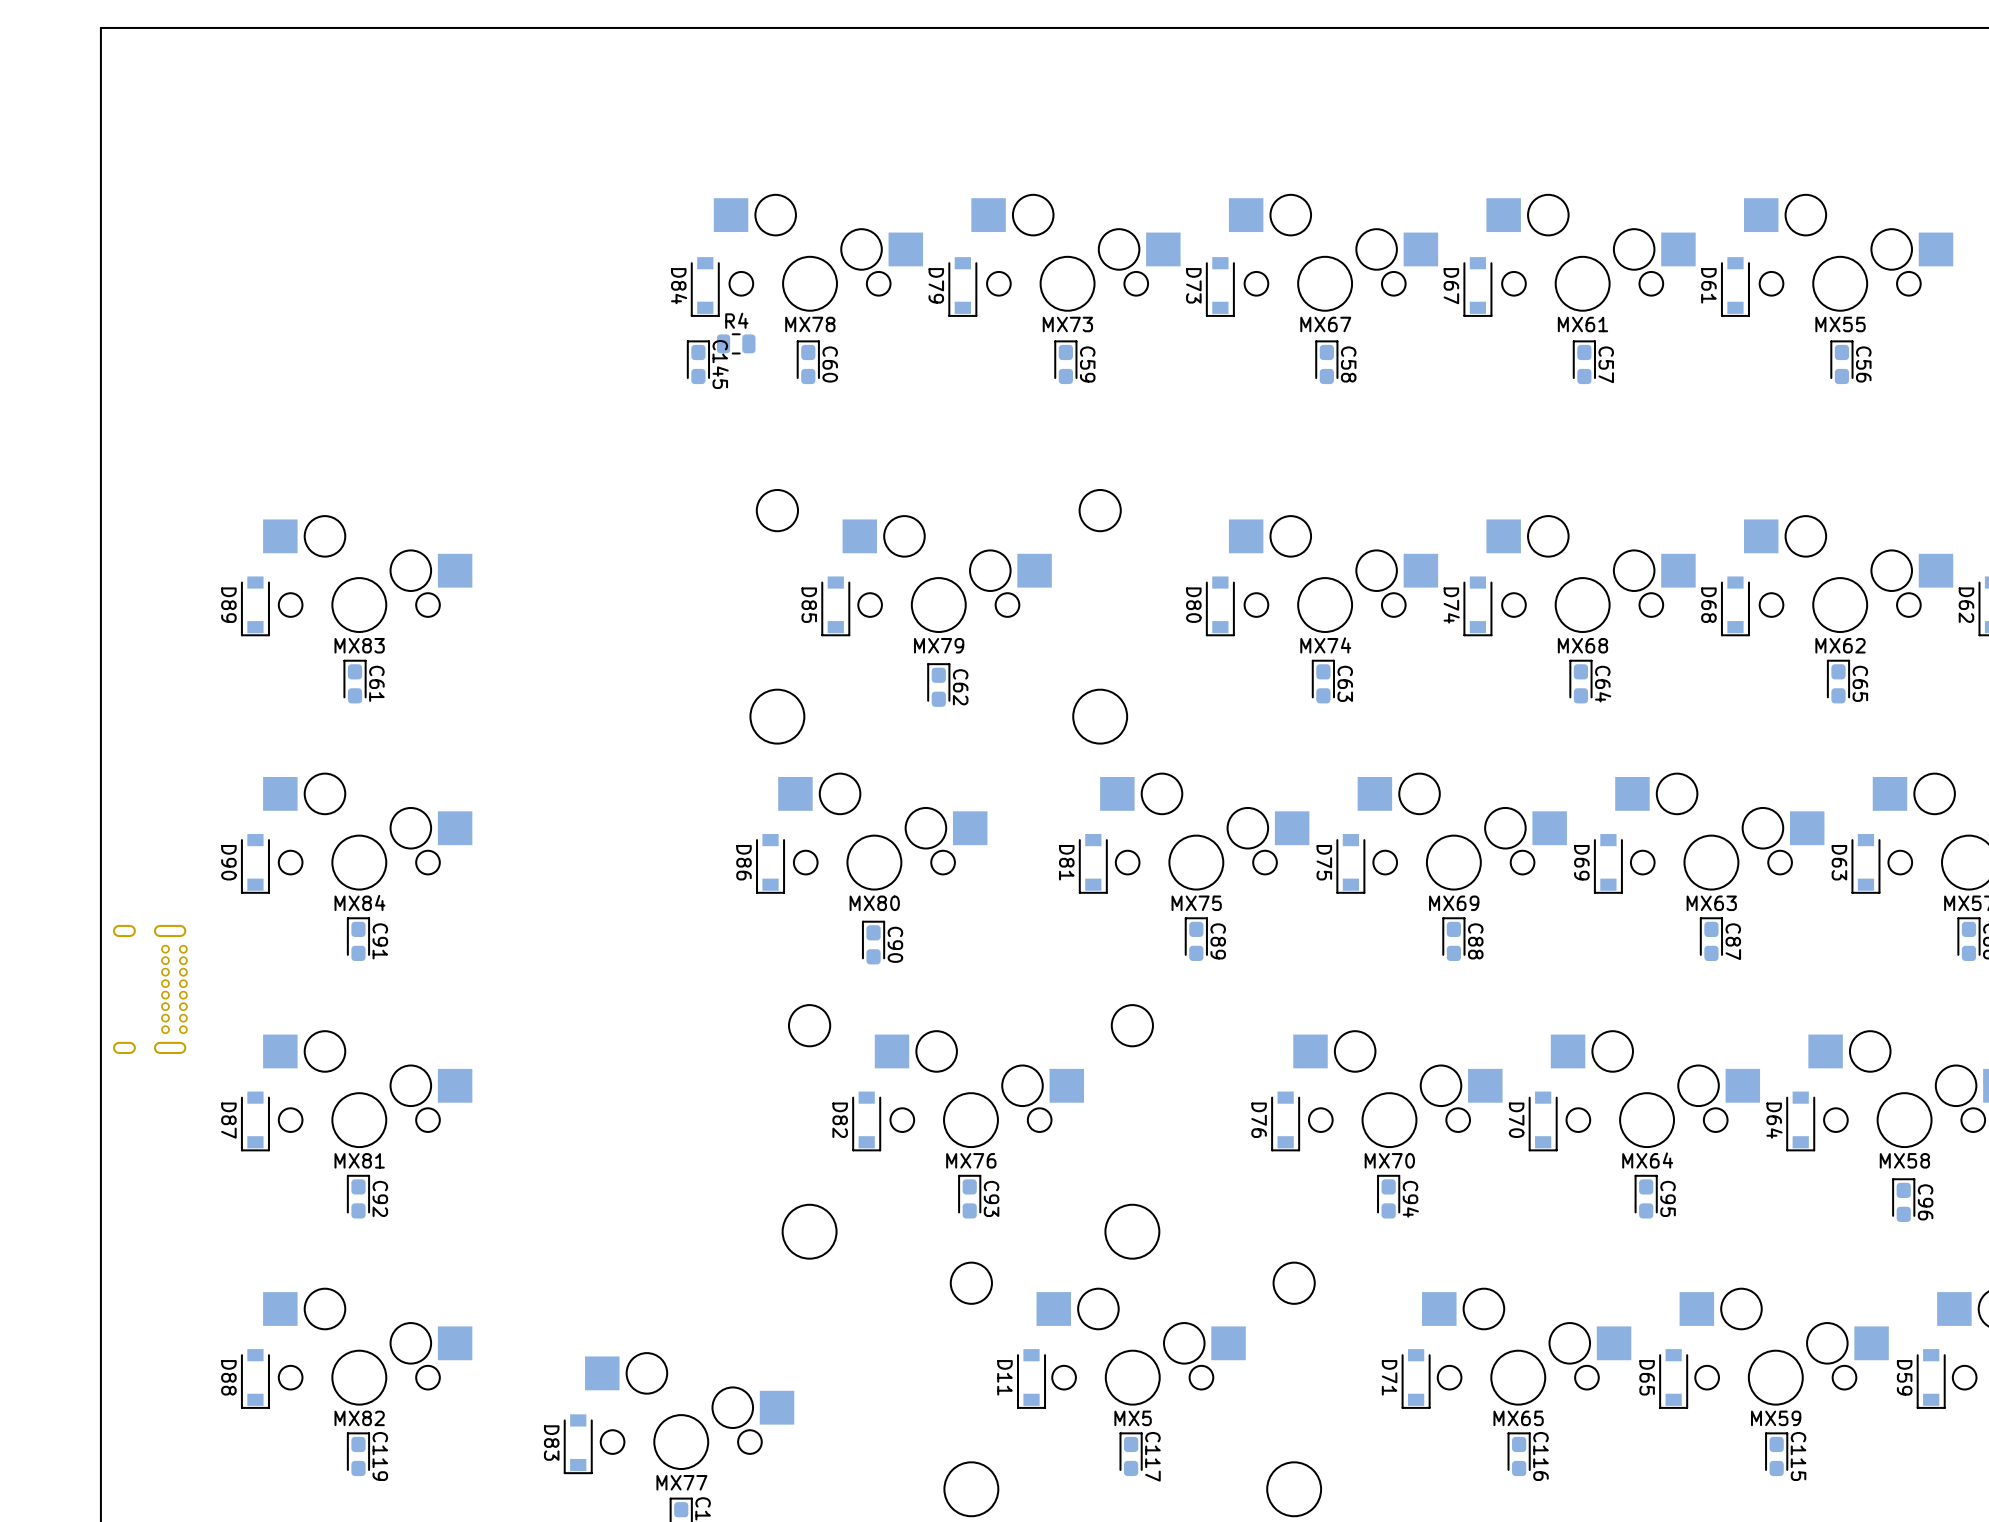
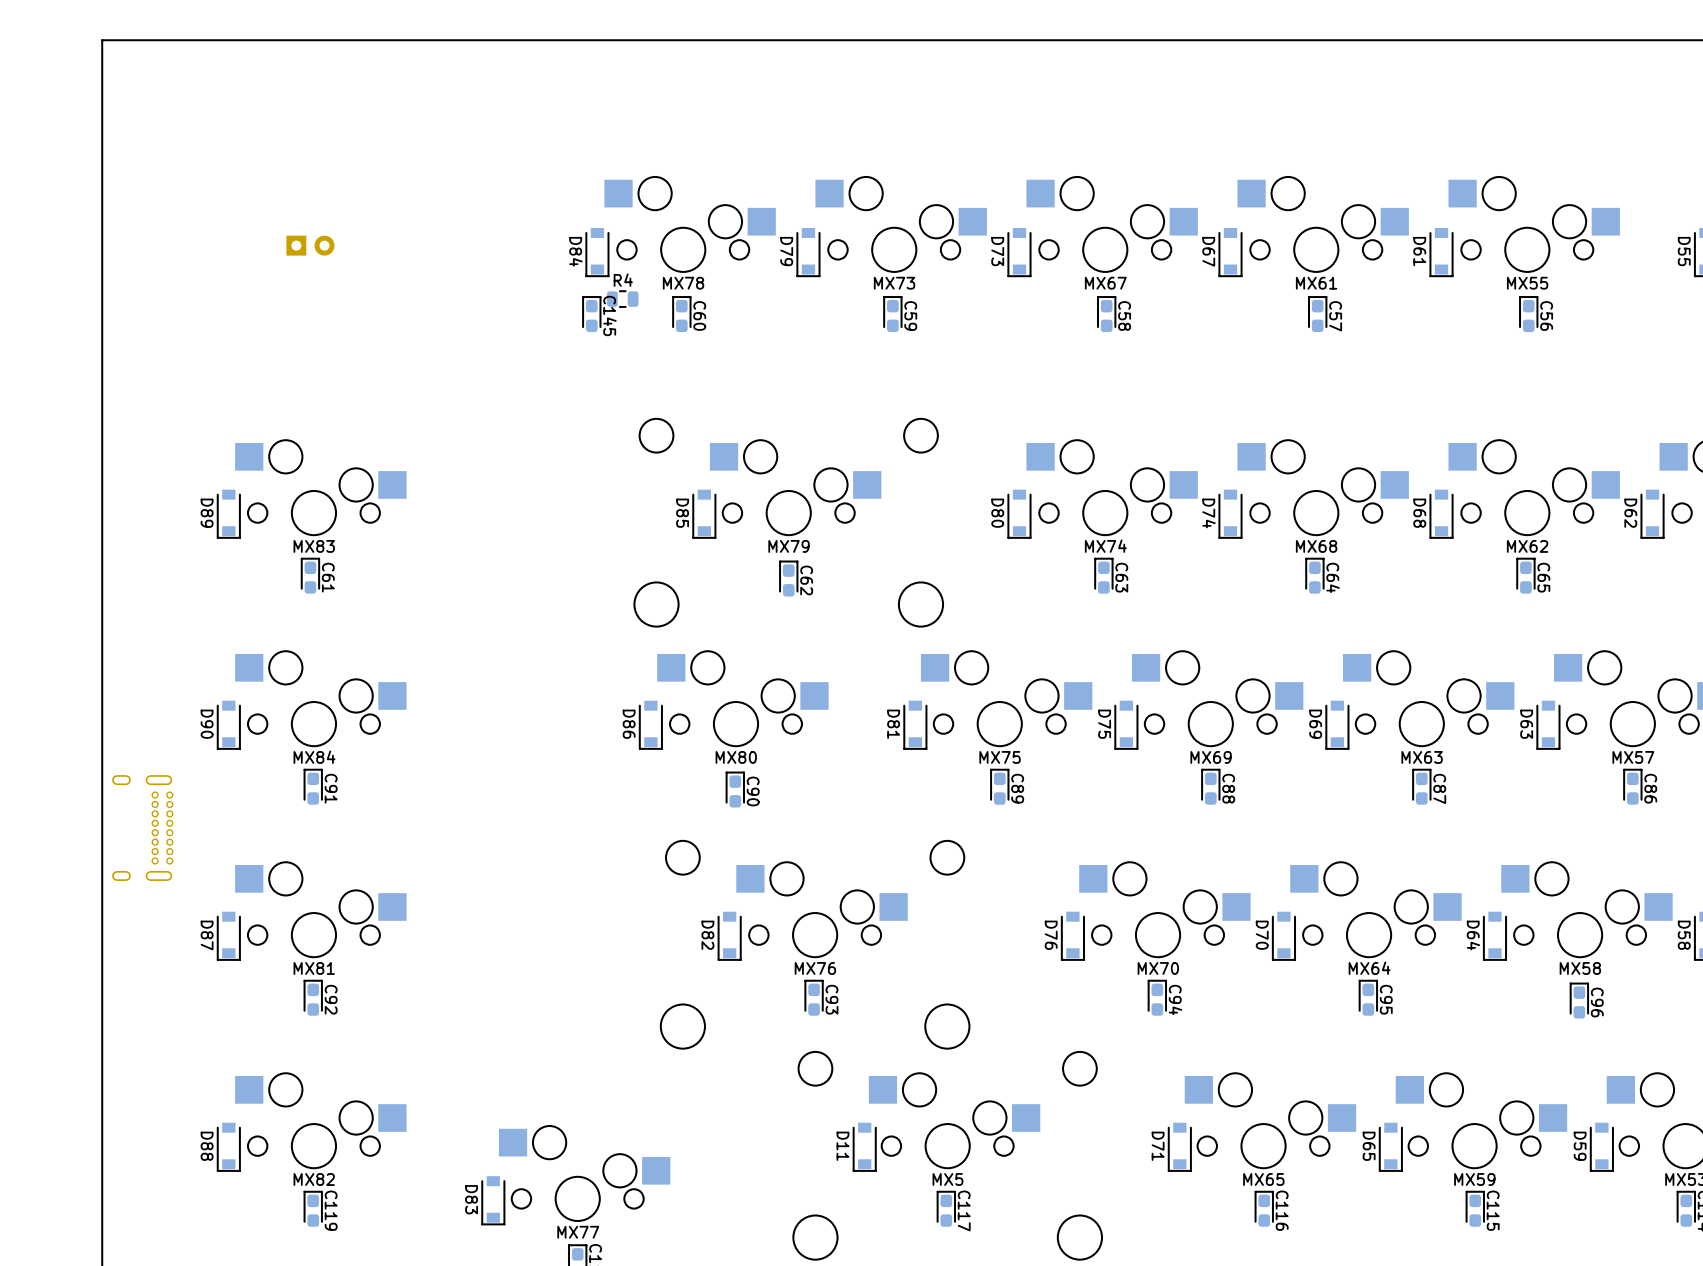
part: none -> (310, 245)

